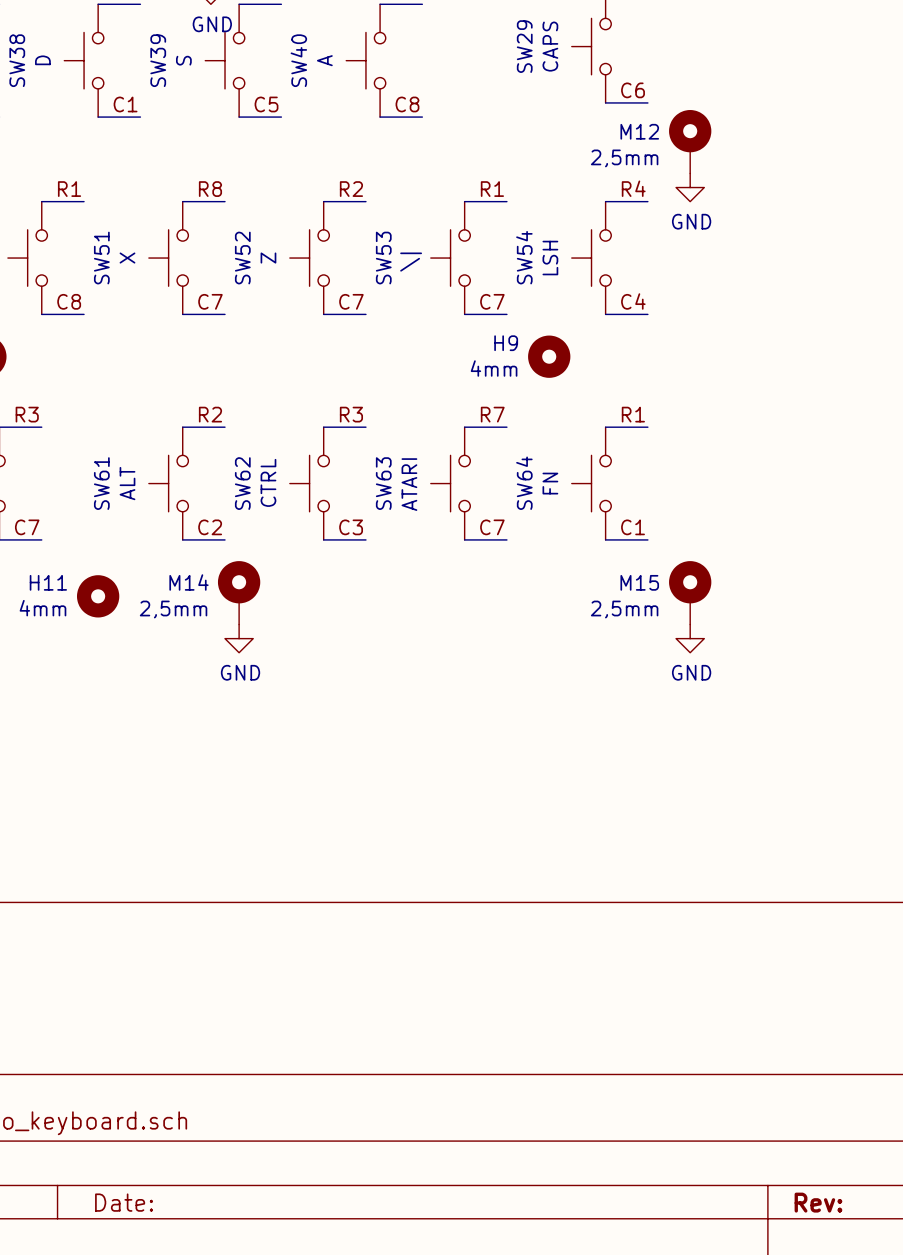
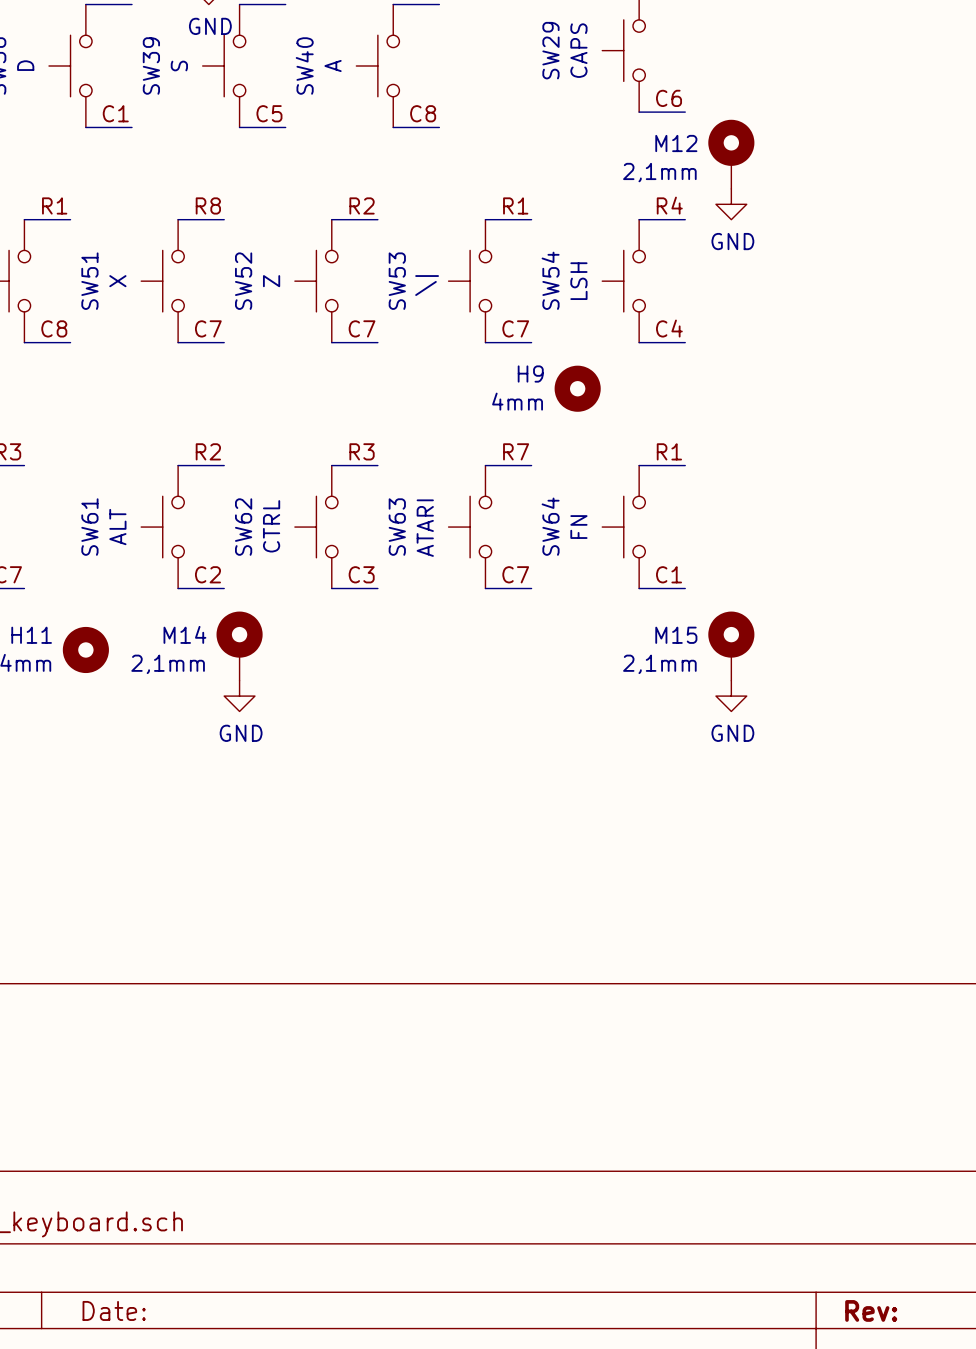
M12 value: 2,5mm (624, 158) -> 2,1mm (659, 172)
M14 value: 2,5mm (173, 609) -> 2,1mm (168, 664)
M15 value: 2,5mm (624, 609) -> 2,1mm (659, 664)

